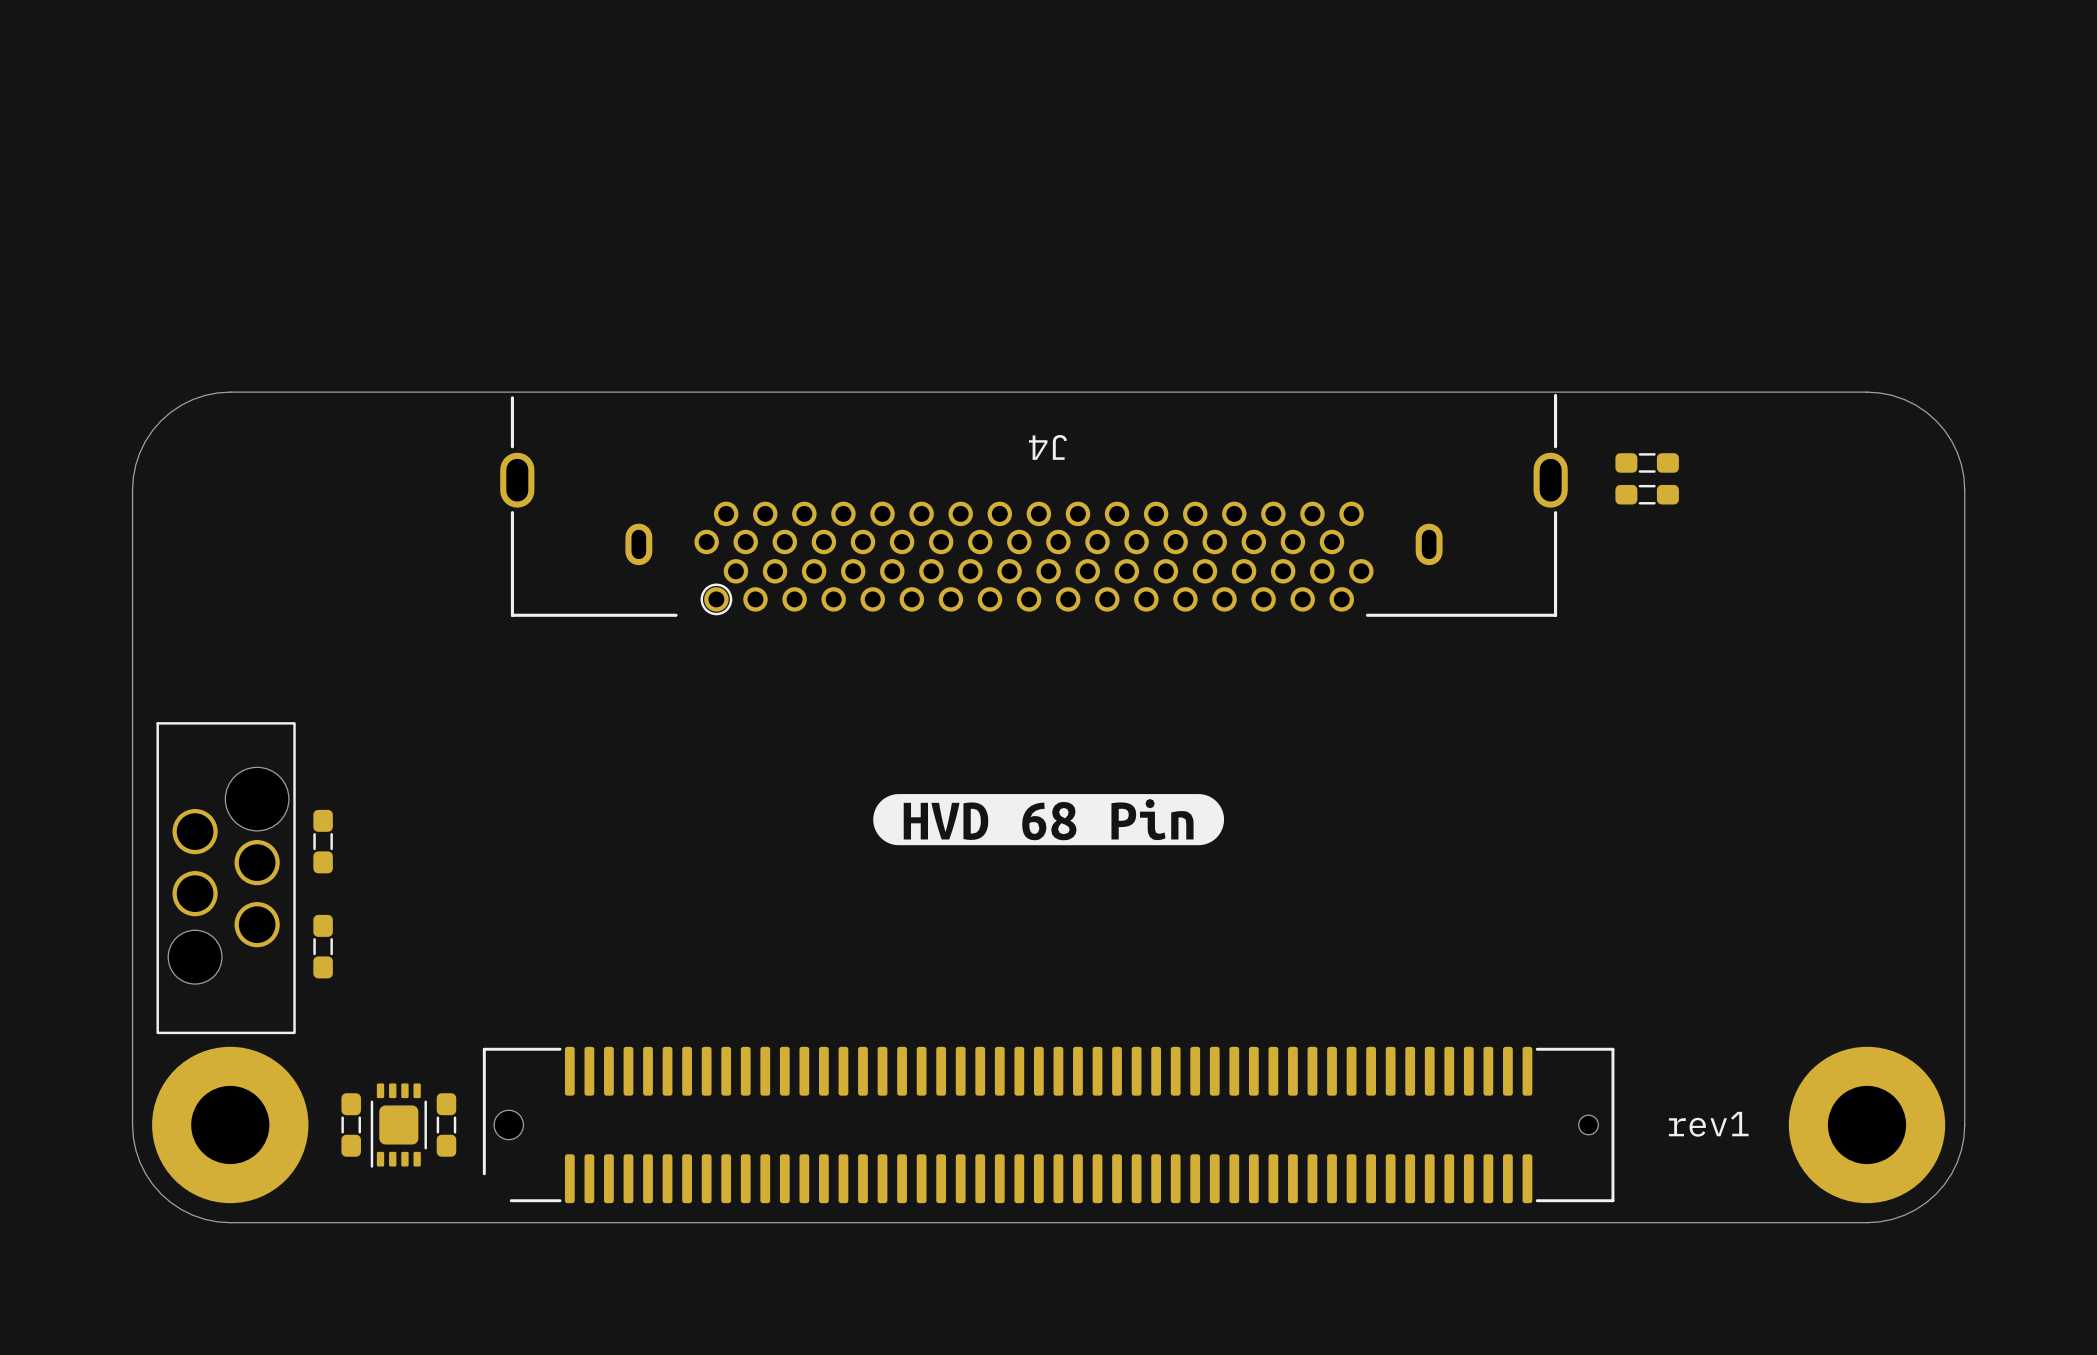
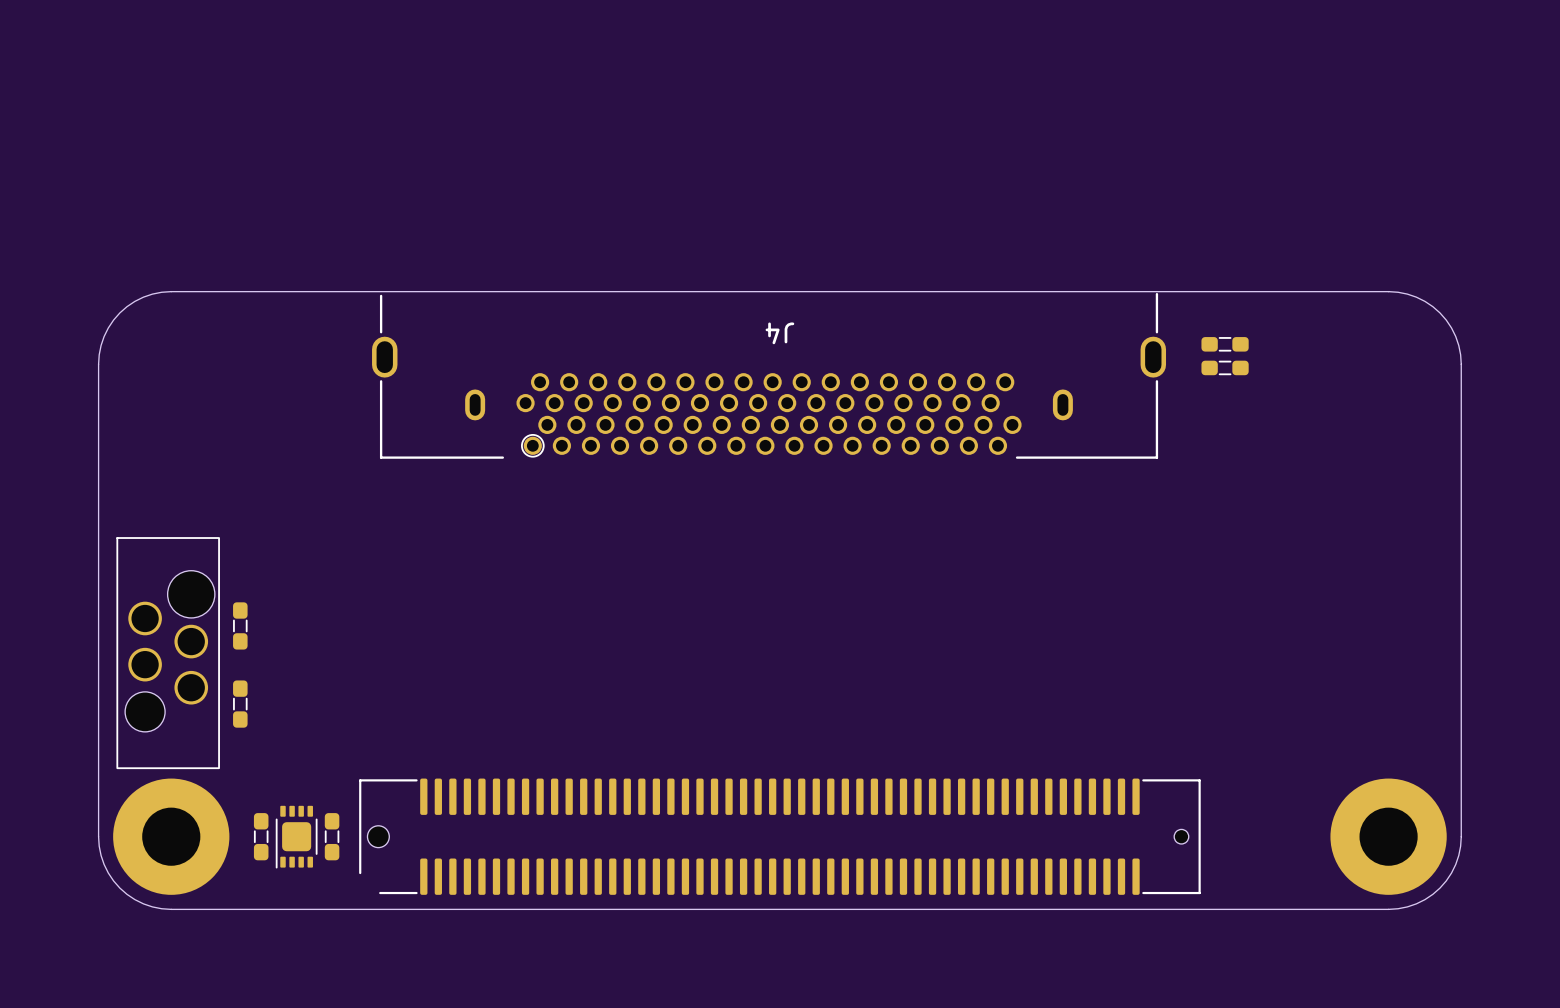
drawing: [873, 794, 1225, 846] -> none
text: rev1 (1708, 1124) -> none

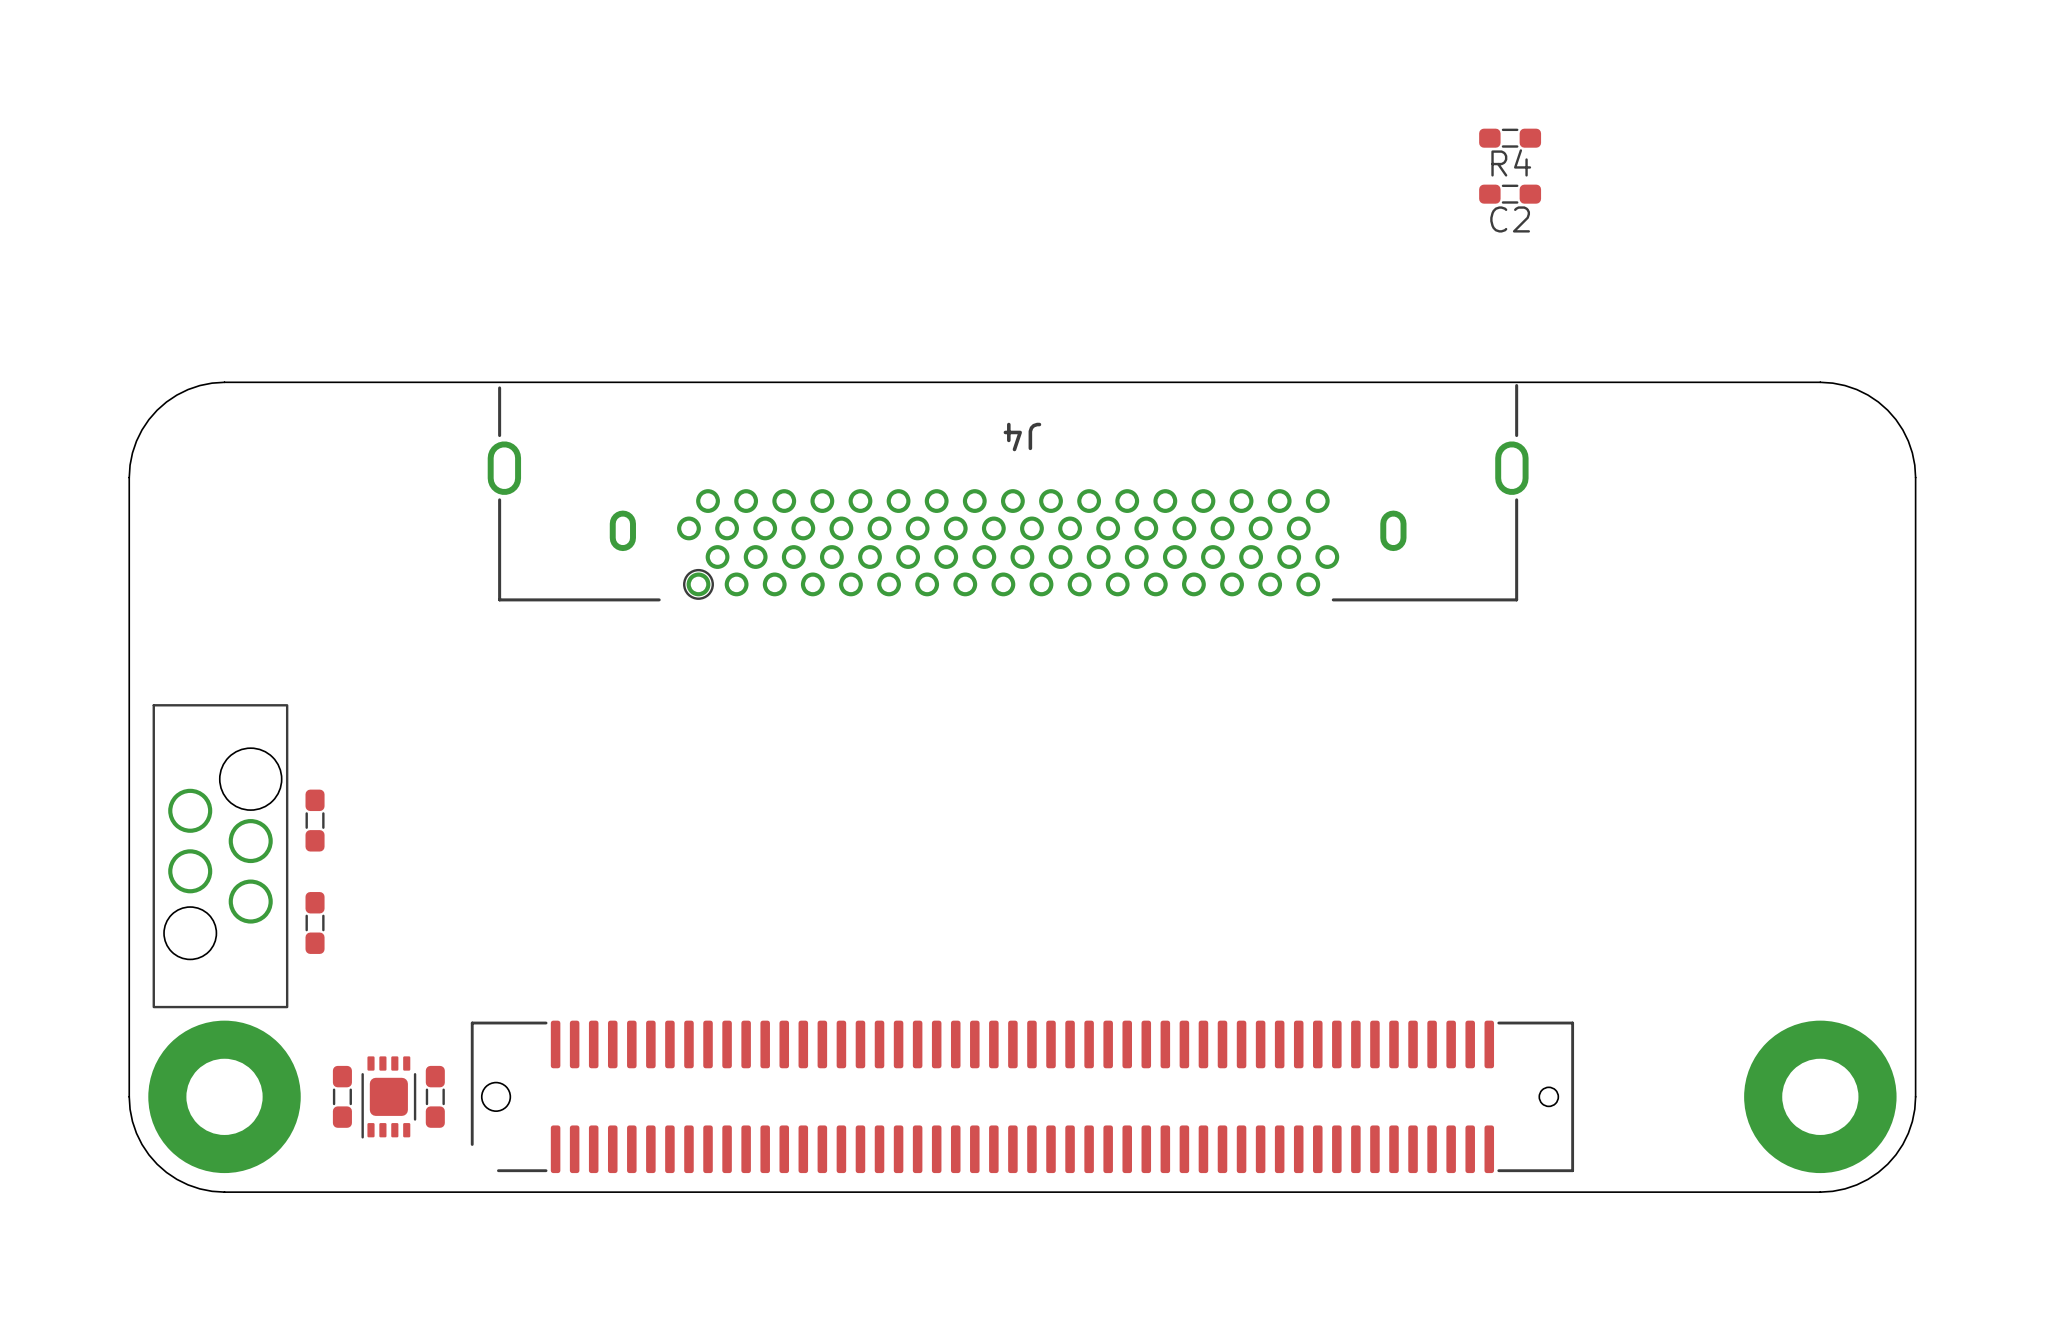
R4: none -> (1510, 138)
C2: none -> (1510, 194)
part: (1225, 344) -> none
part: (1225, 367) -> none

